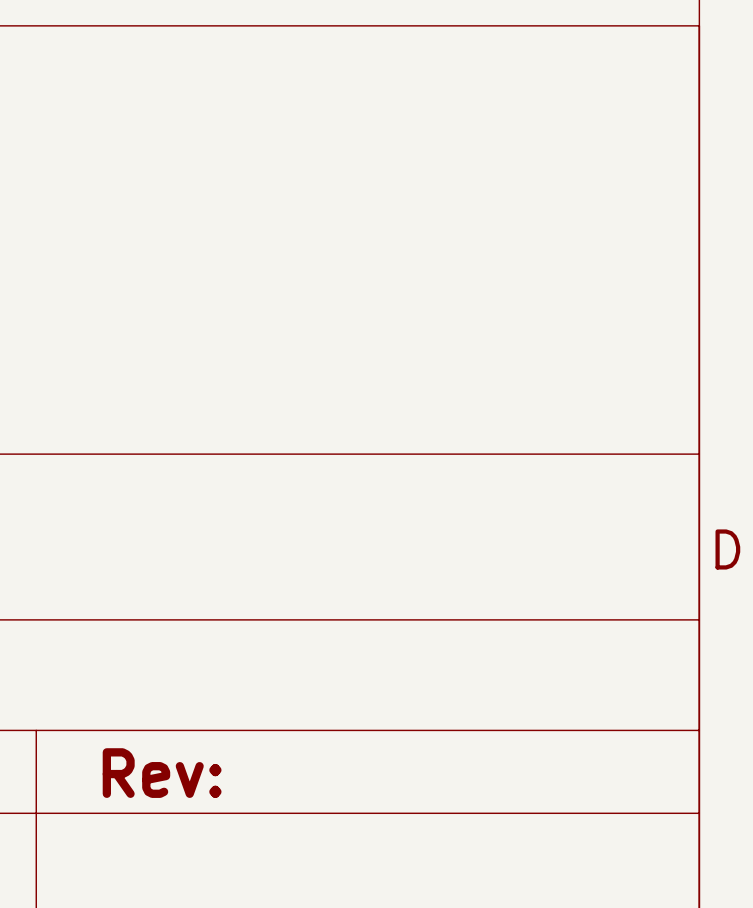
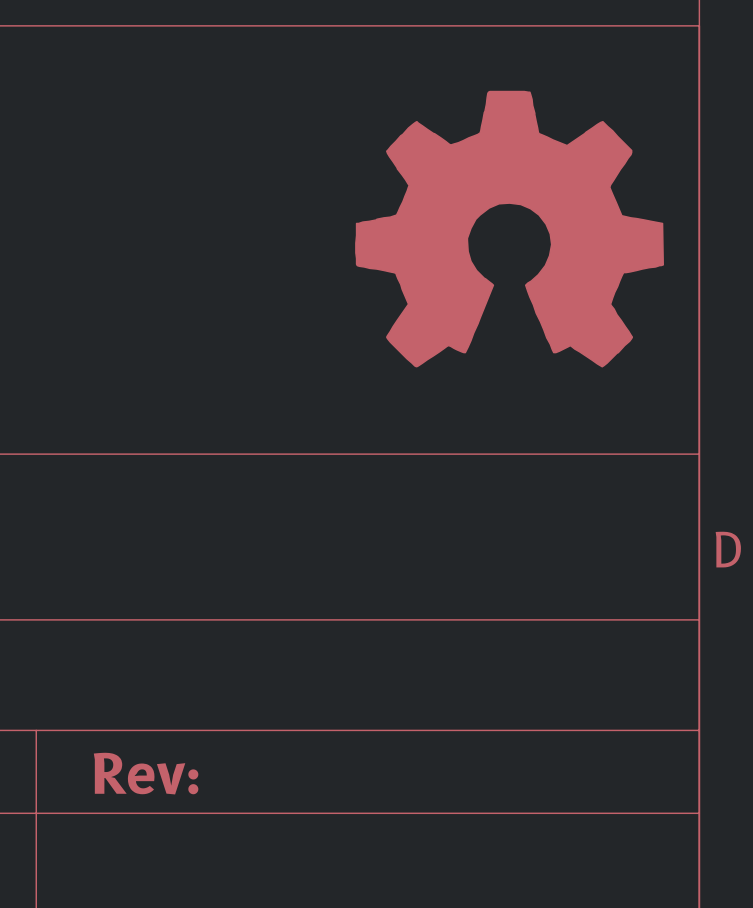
power symbol: none -> (509, 229)

